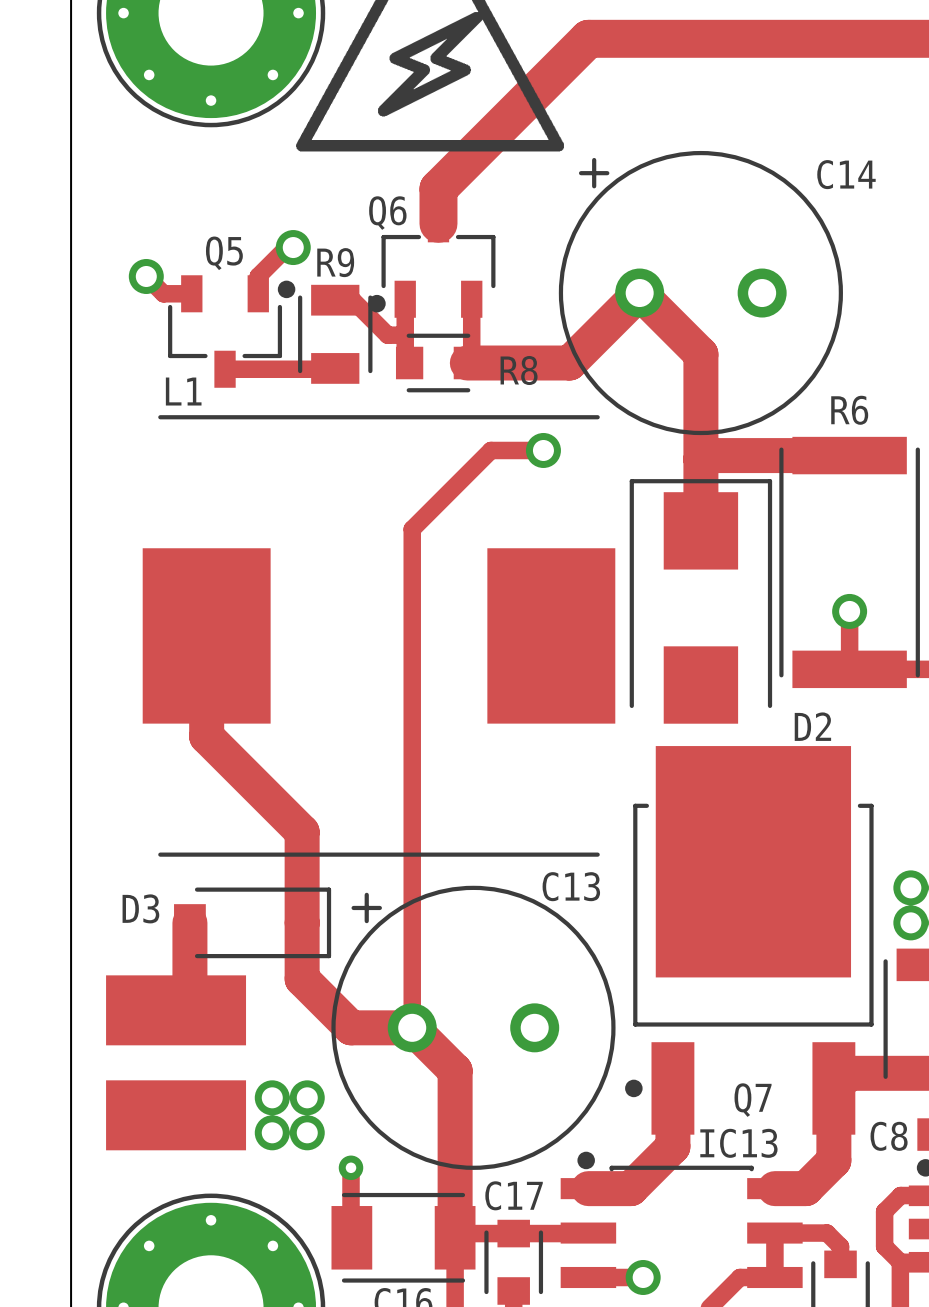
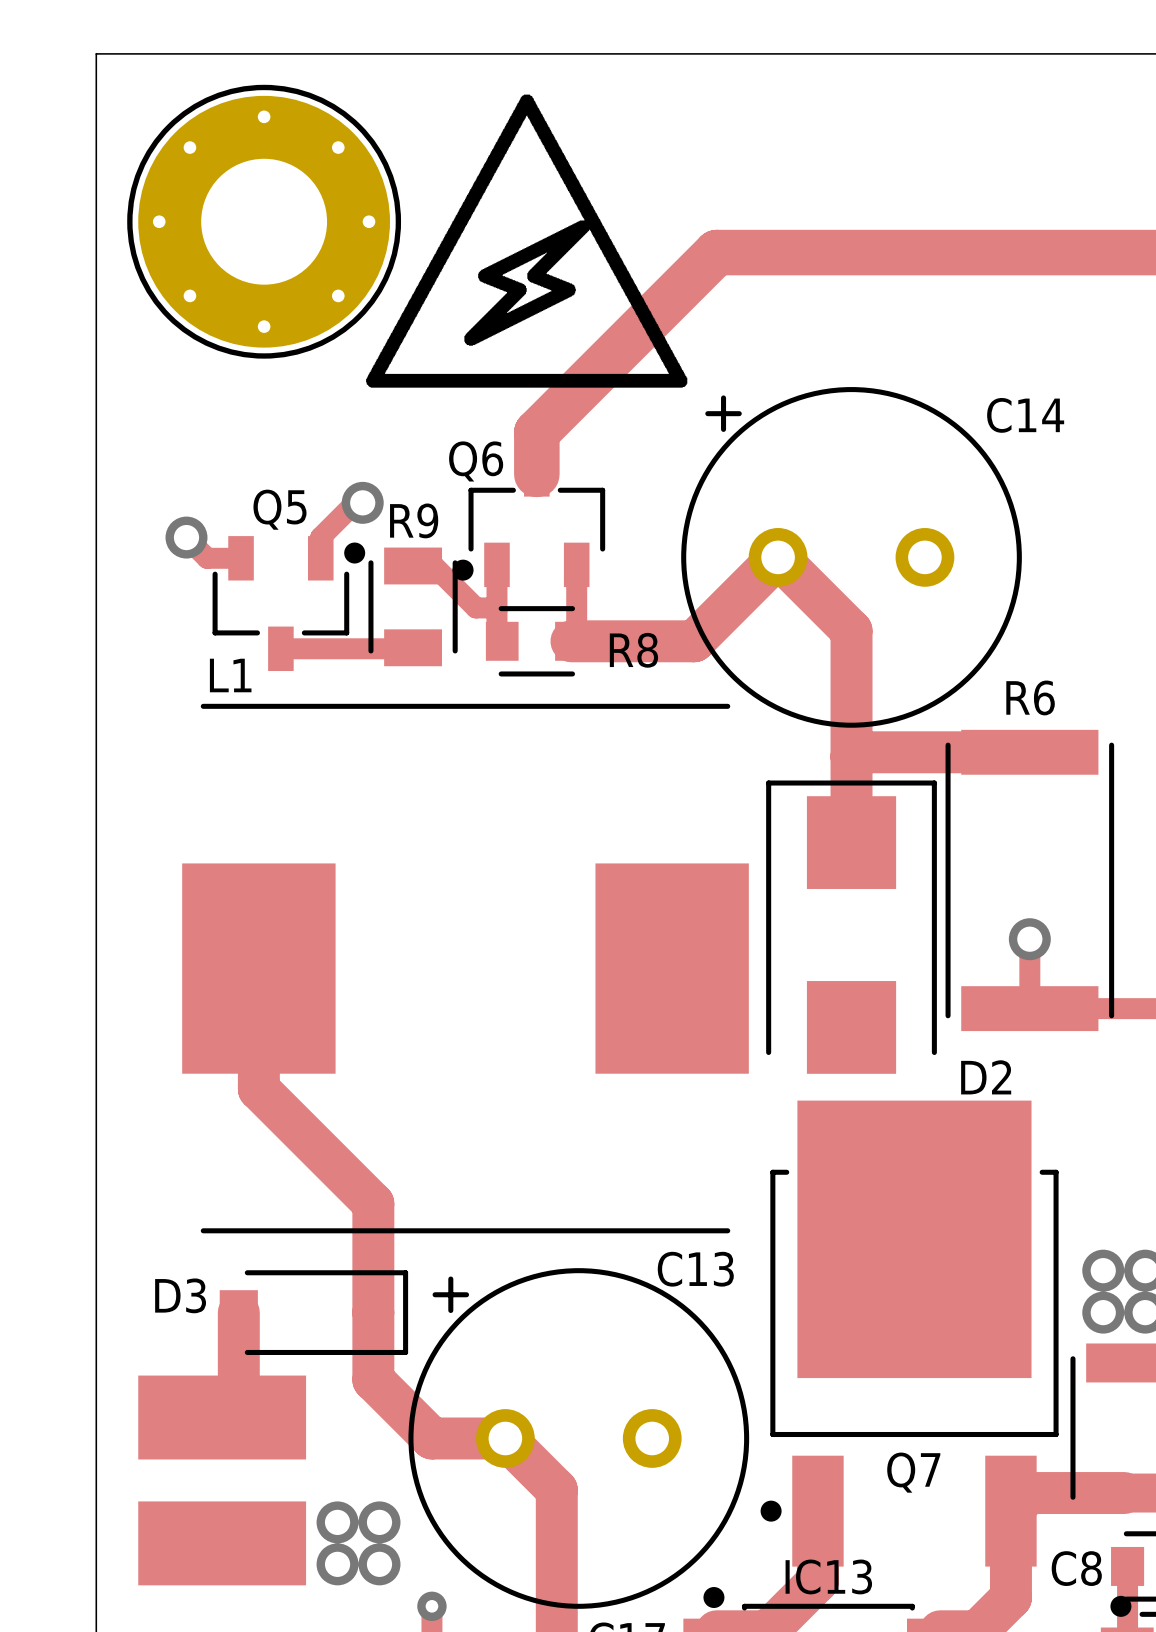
track: (543, 450) (490, 450) (412, 529) (412, 1027) -> none
via: (543, 450) -> none
Q7 name position: Q7 (753, 1100) -> Q7 (913, 1472)
IC13 name position: IC13 (738, 1143) -> IC13 (828, 1576)

